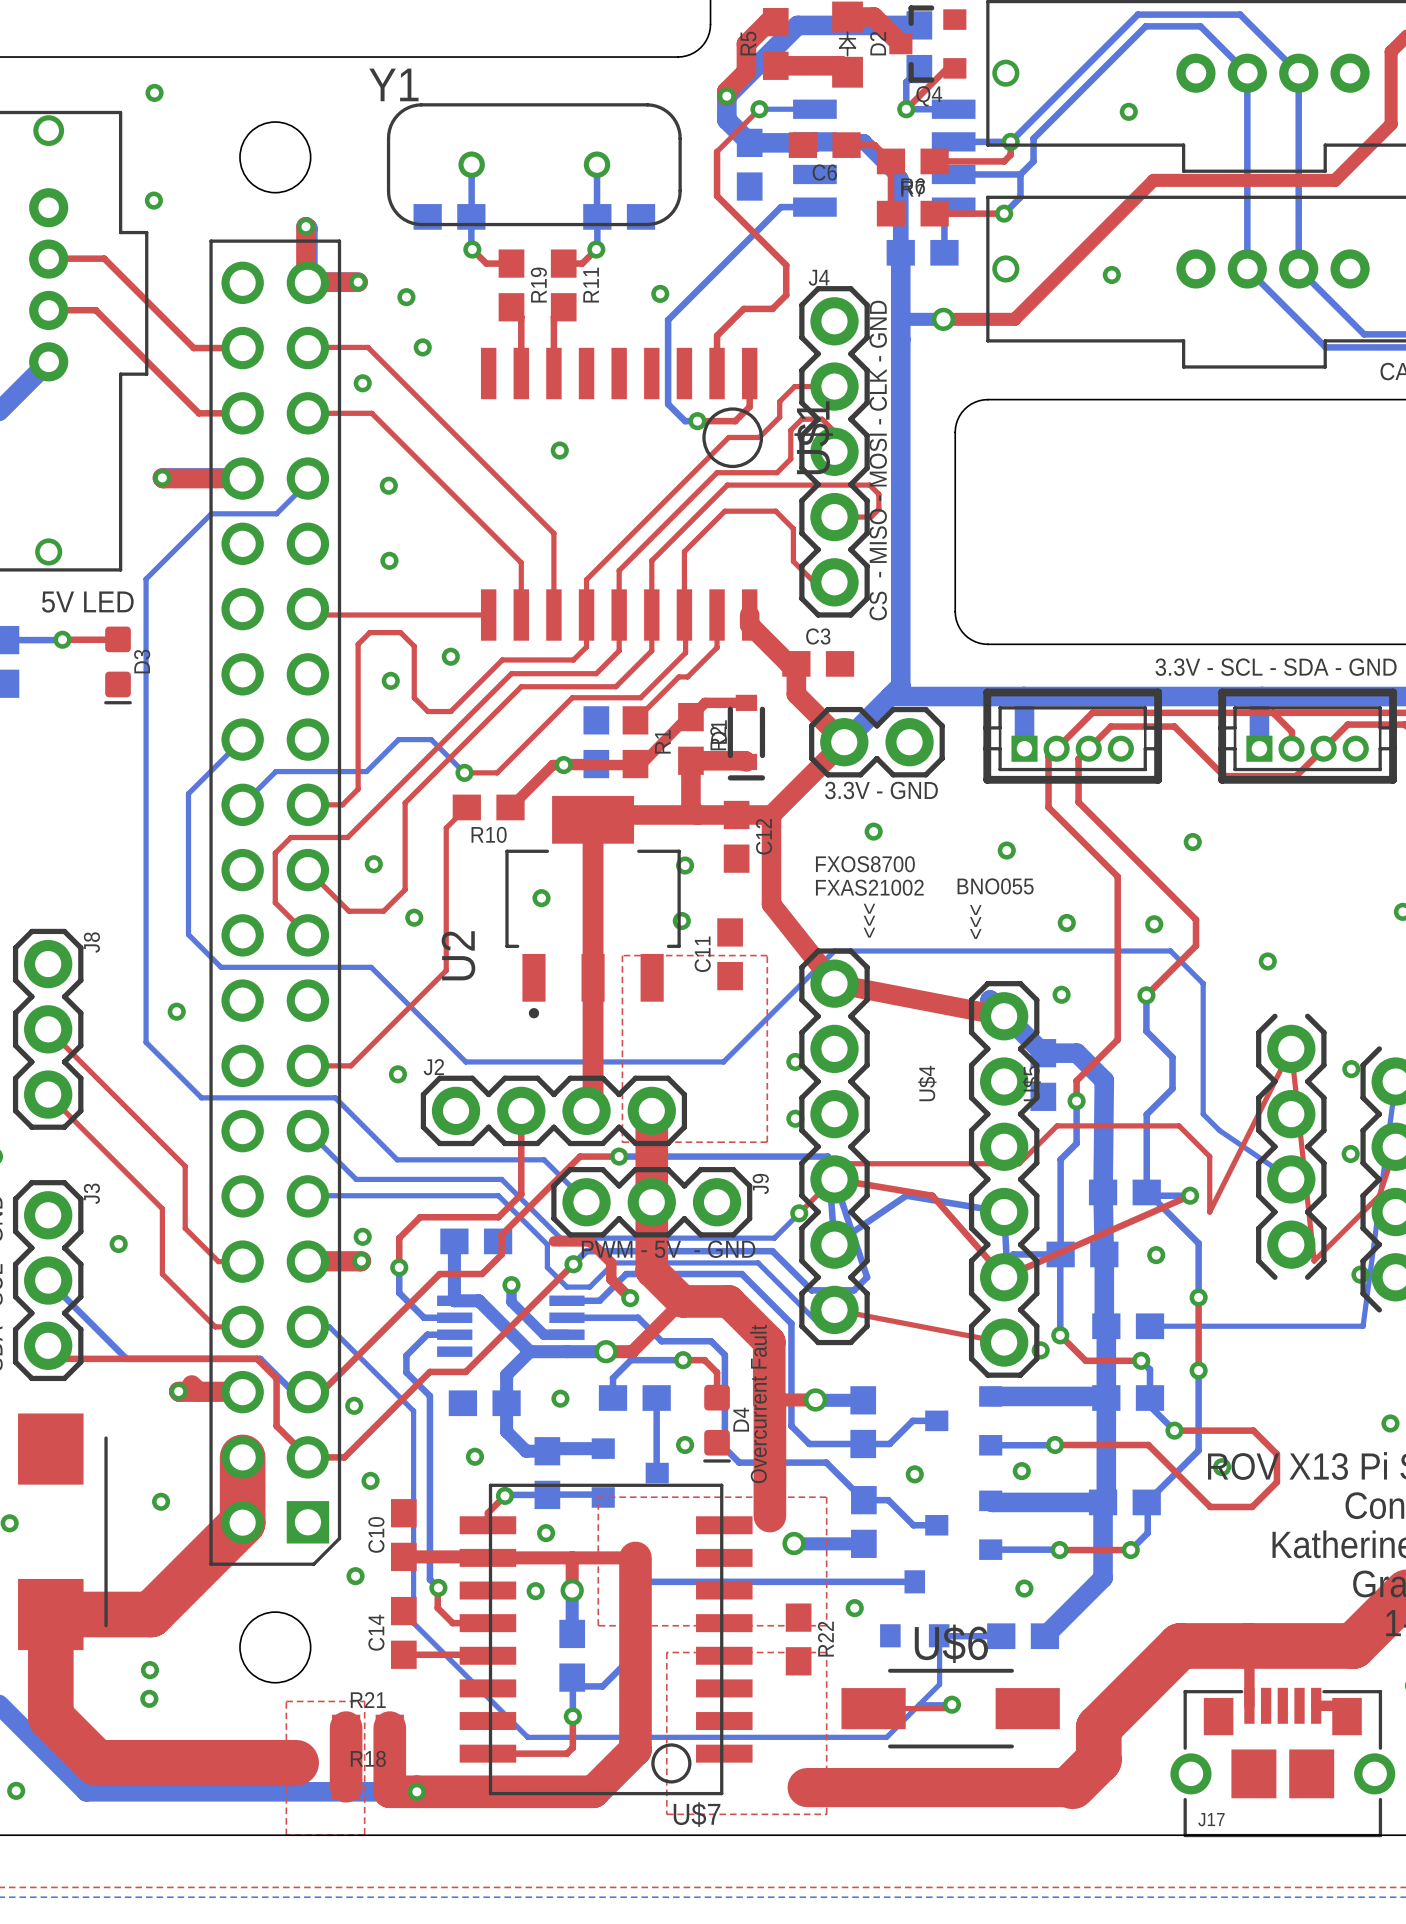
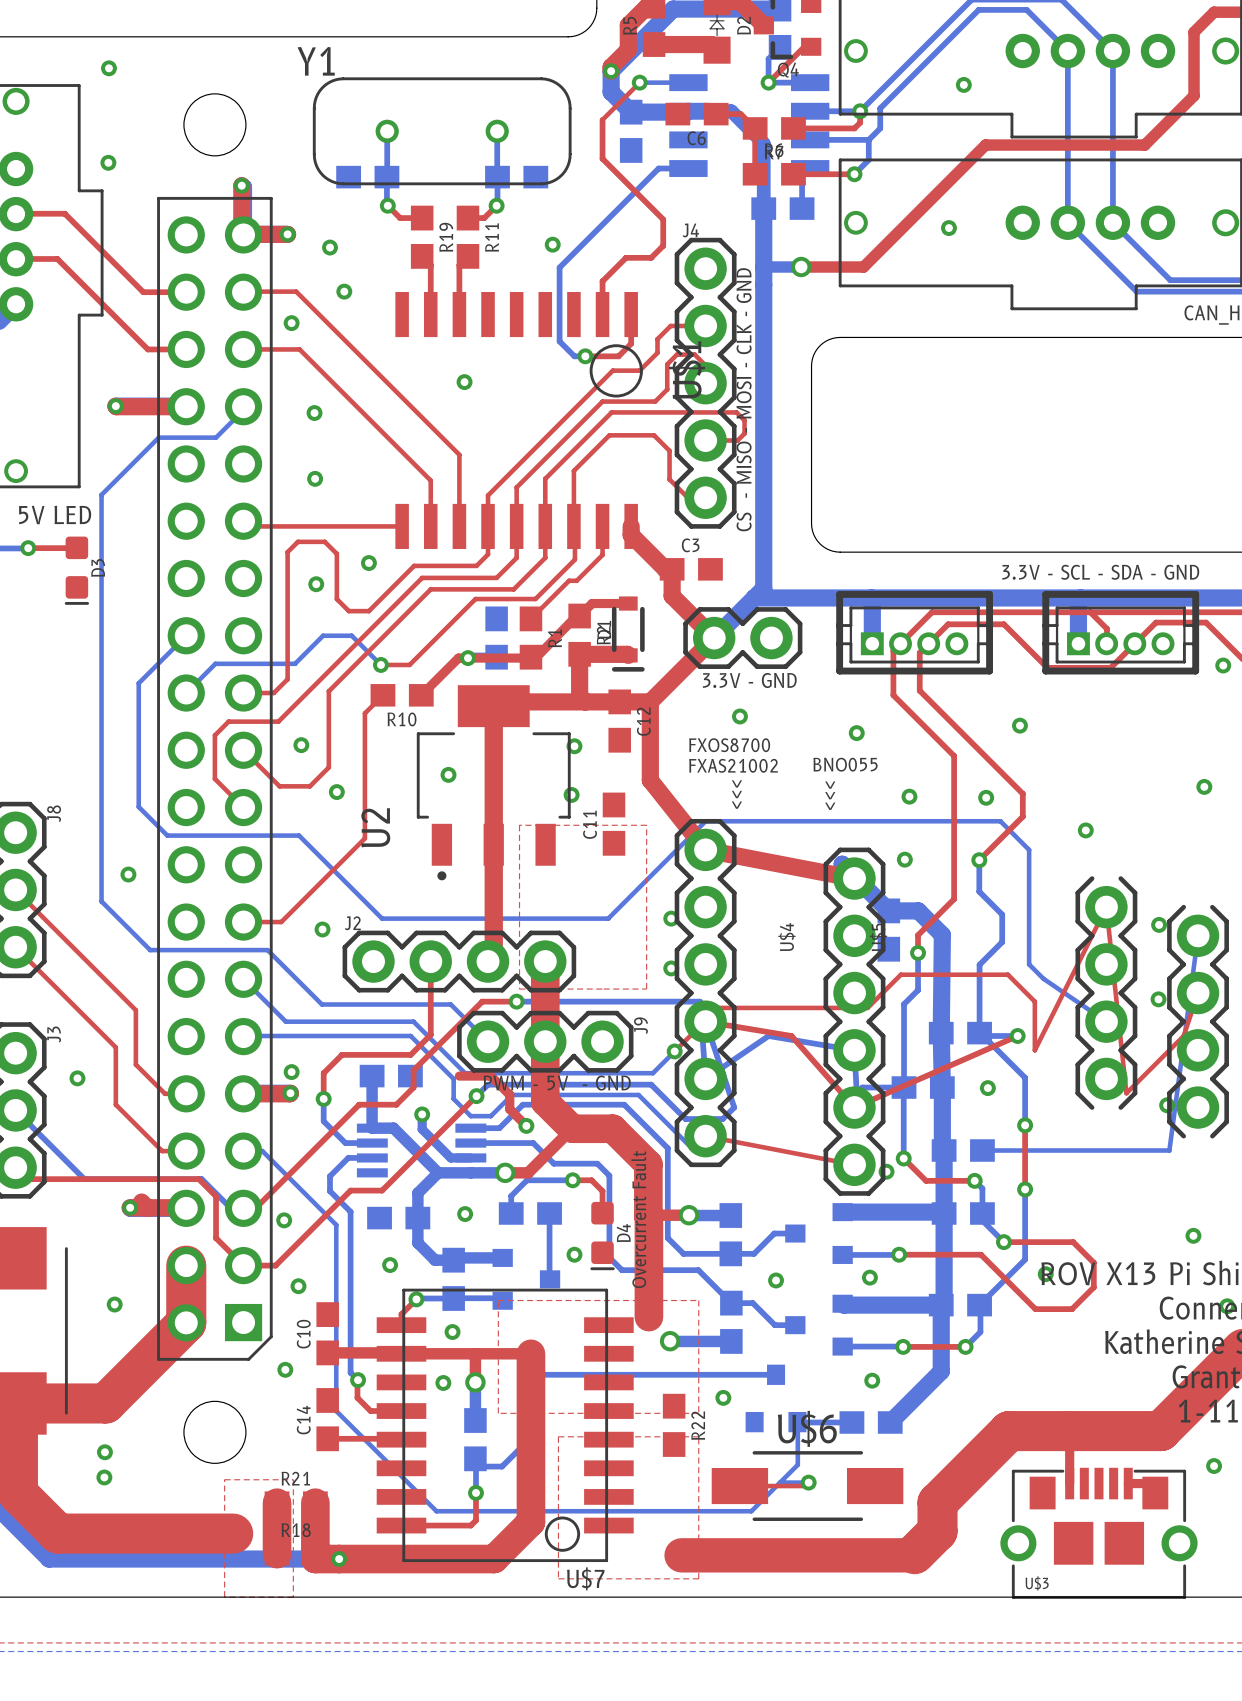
J17 name: J17 (1211, 1819) -> U$3 (1037, 1583)

